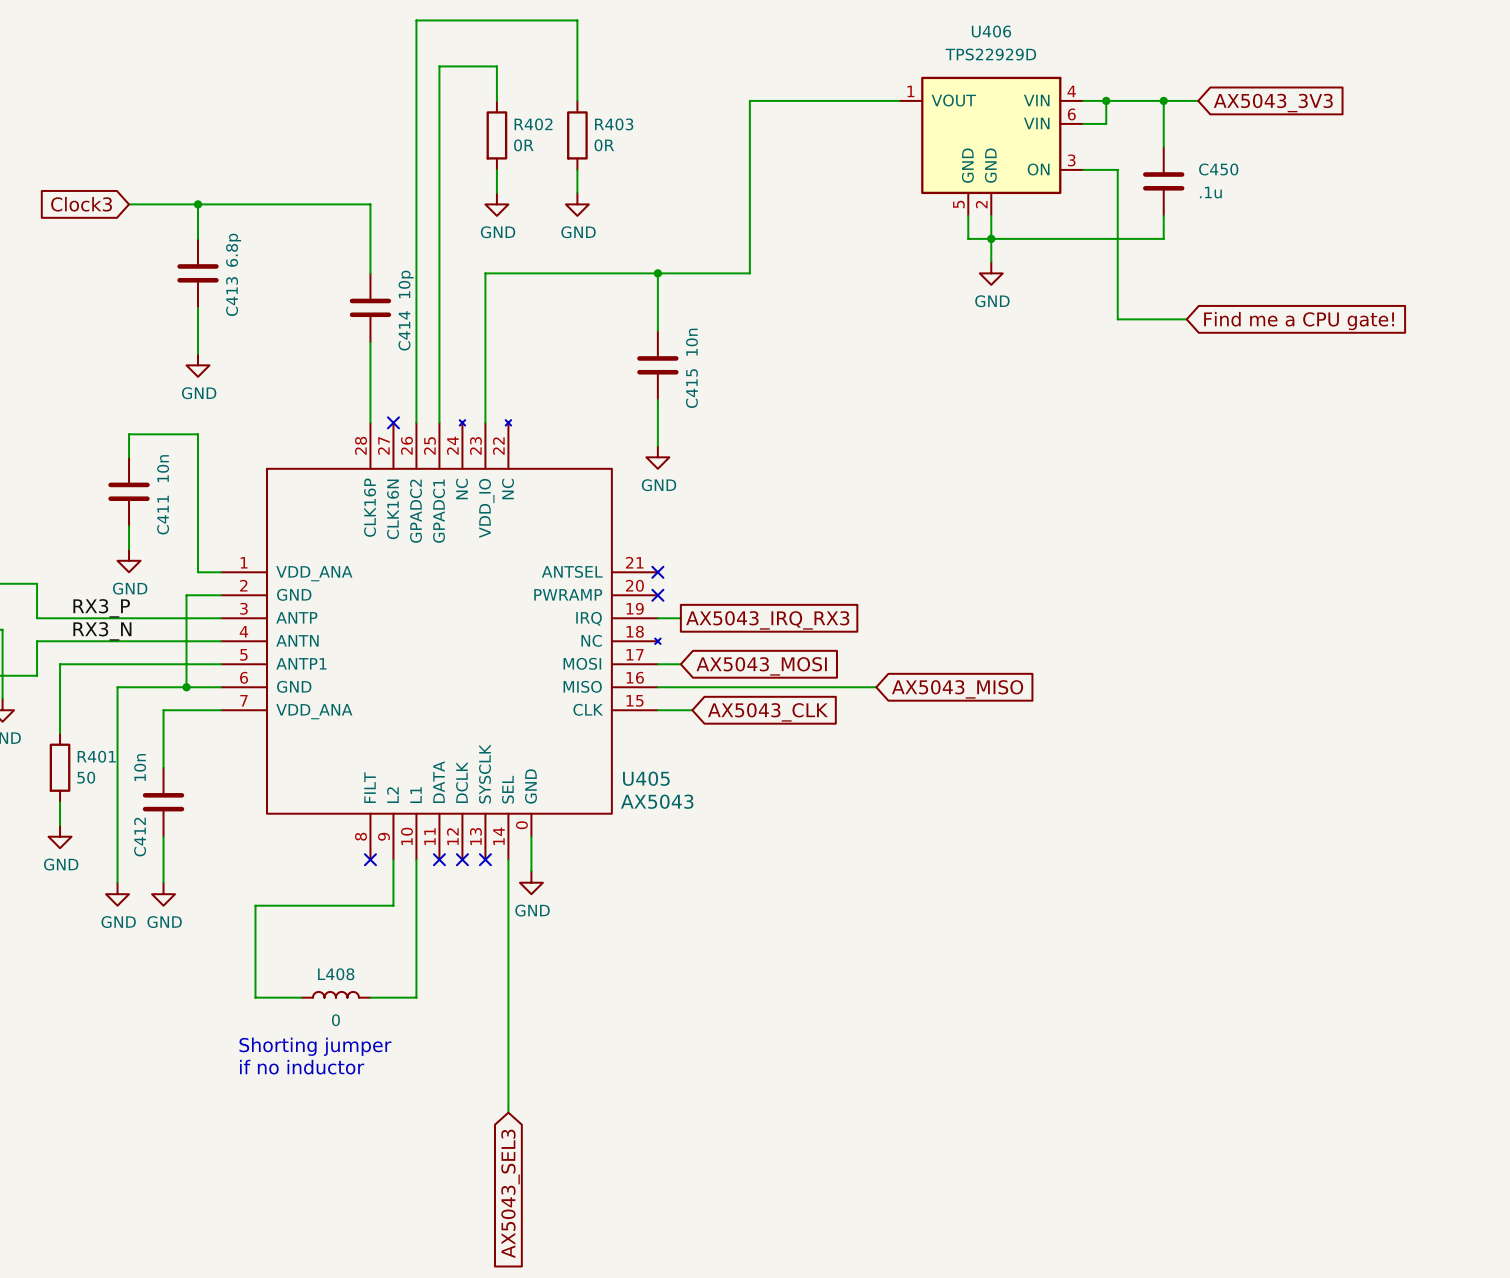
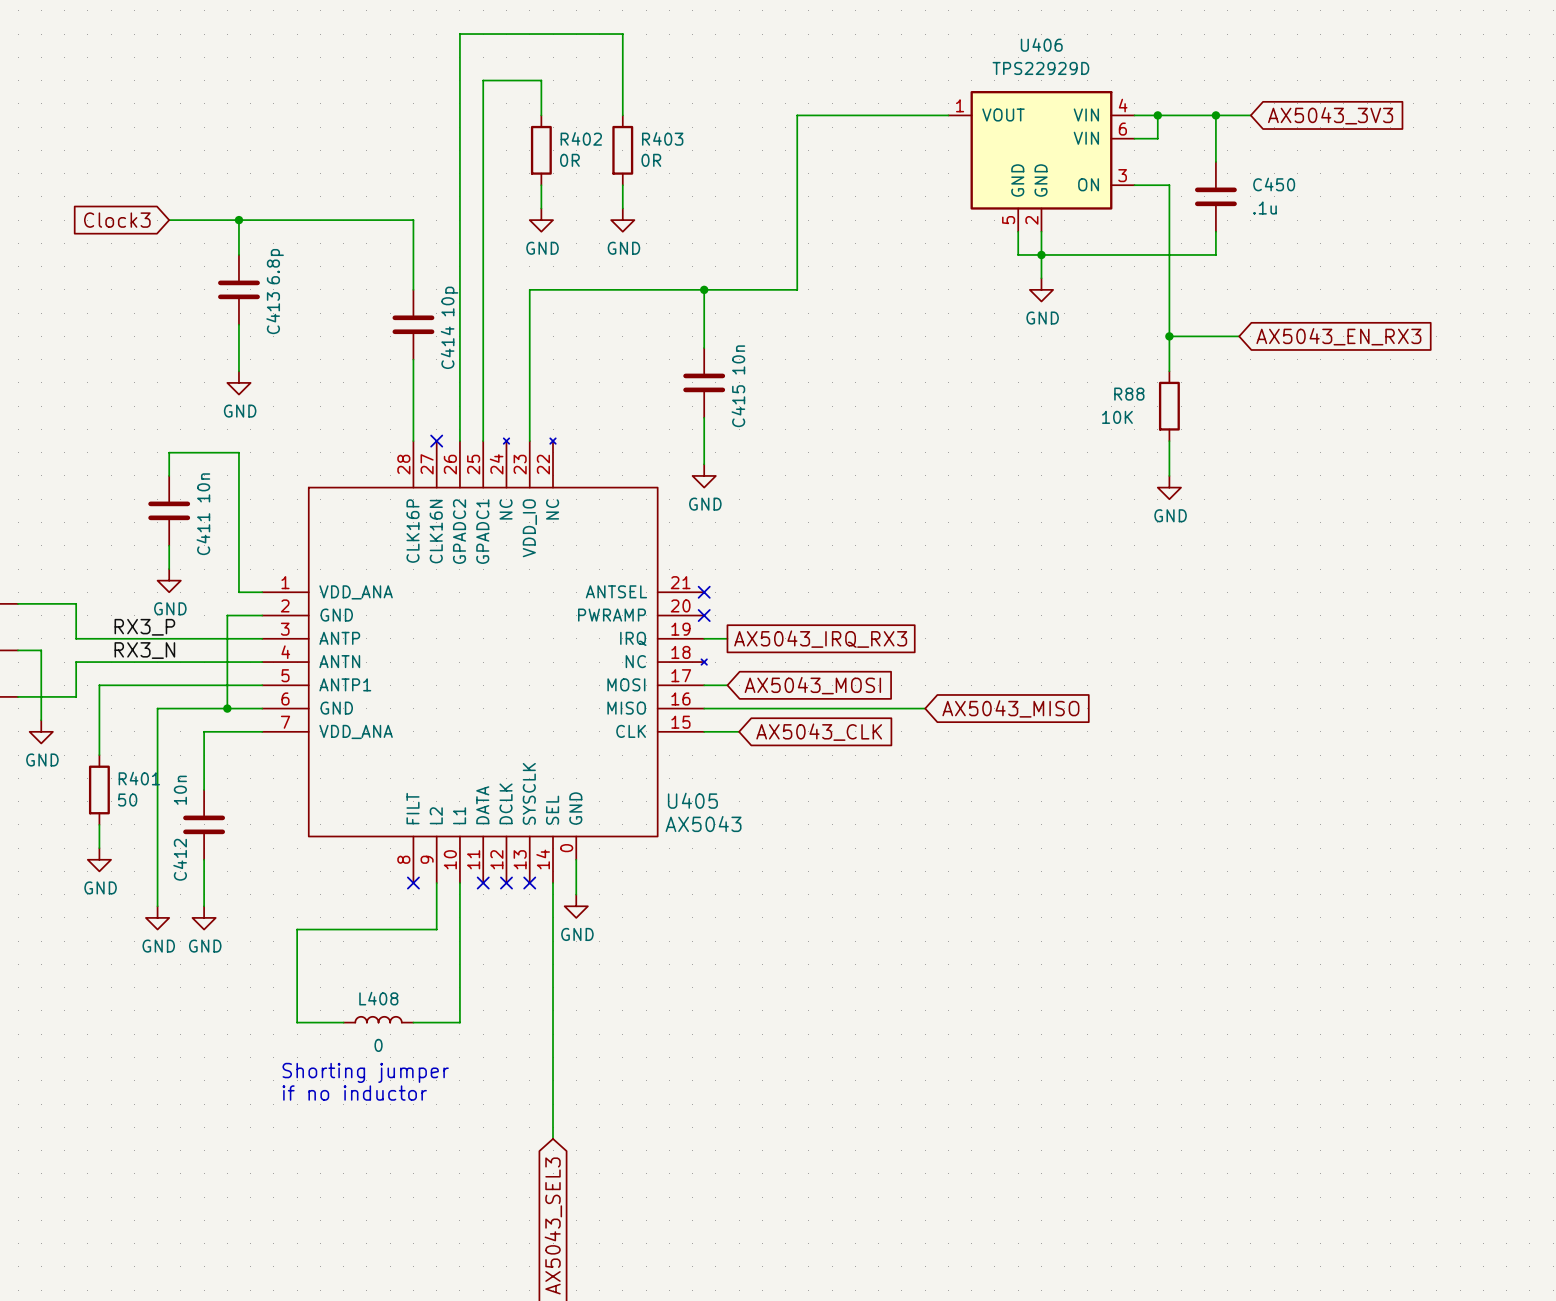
wire: none -> (1169, 336) (1169, 371)
junction: none -> (1169, 336)
global label: Find me a CPU gate! (1299, 321) -> AX5043_EN_RX3 (1338, 336)
R88: none -> 10K (1169, 406)
wire: none -> (1169, 441) (1169, 475)
power symbol: none -> GND (1169, 487)

